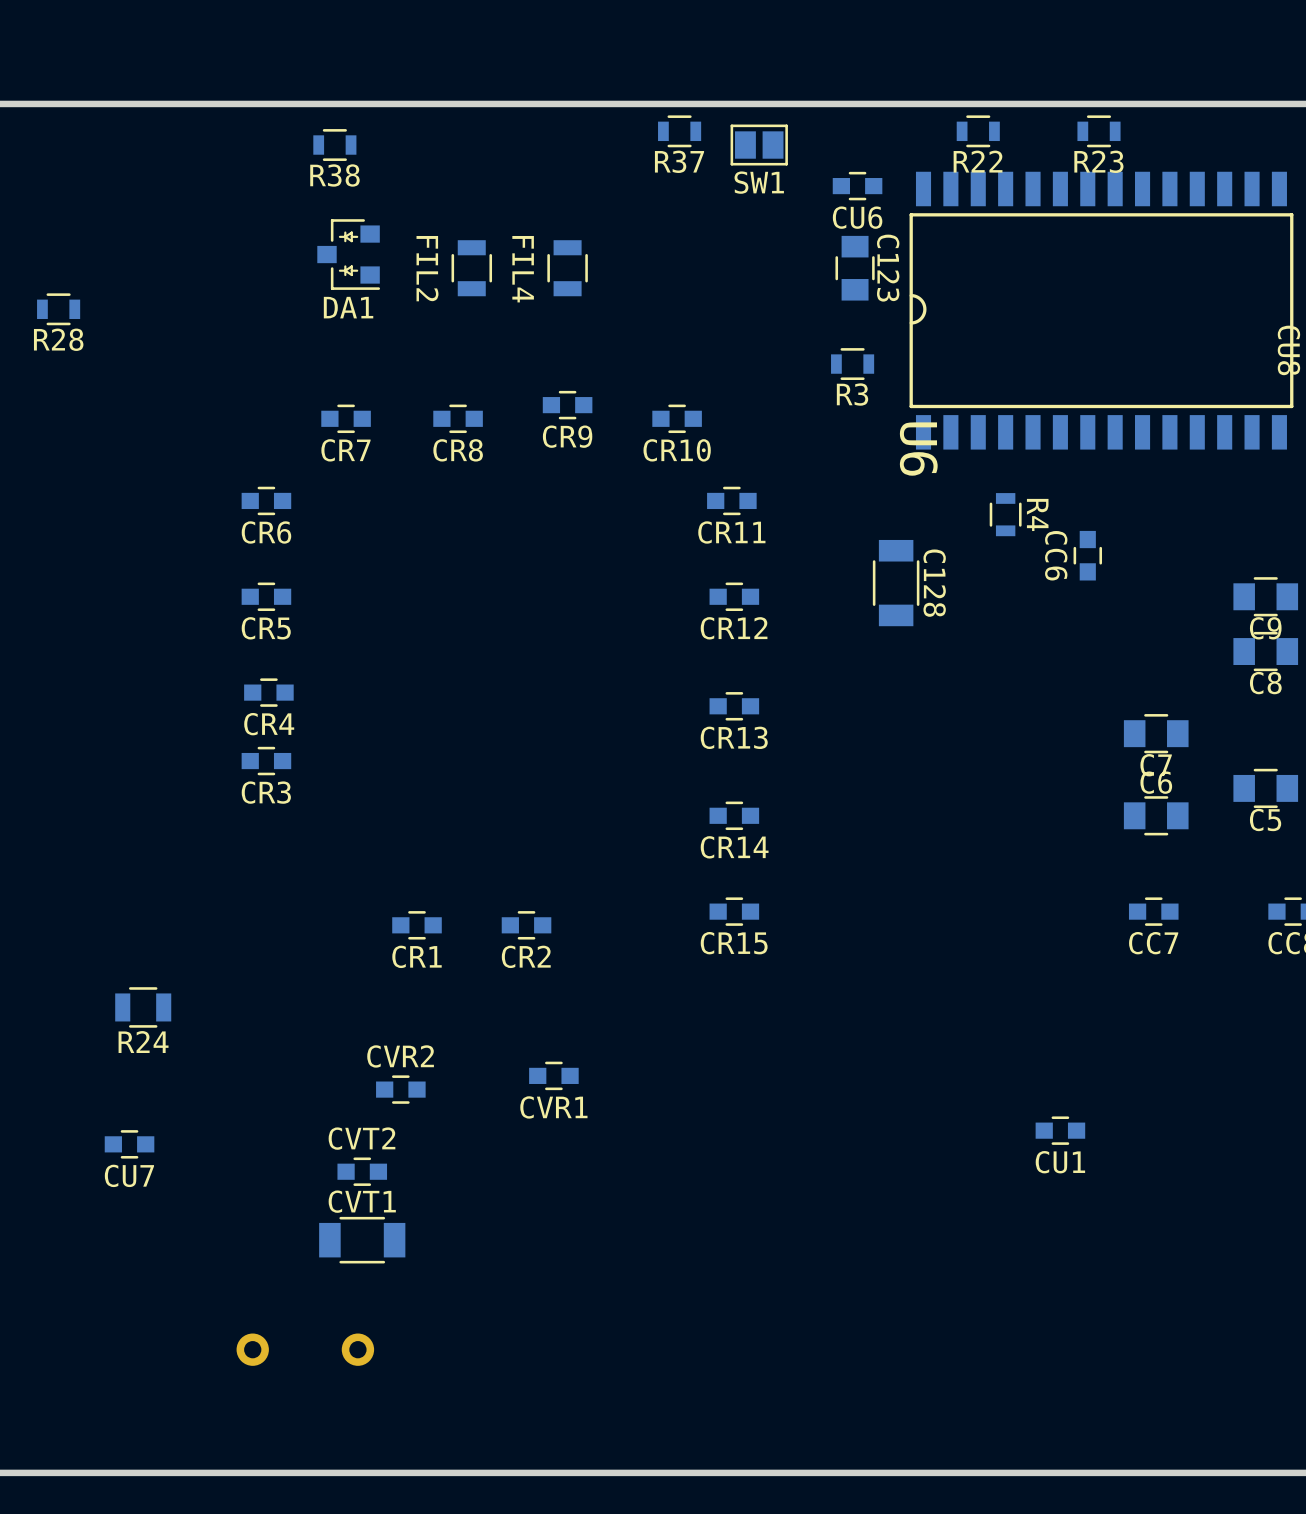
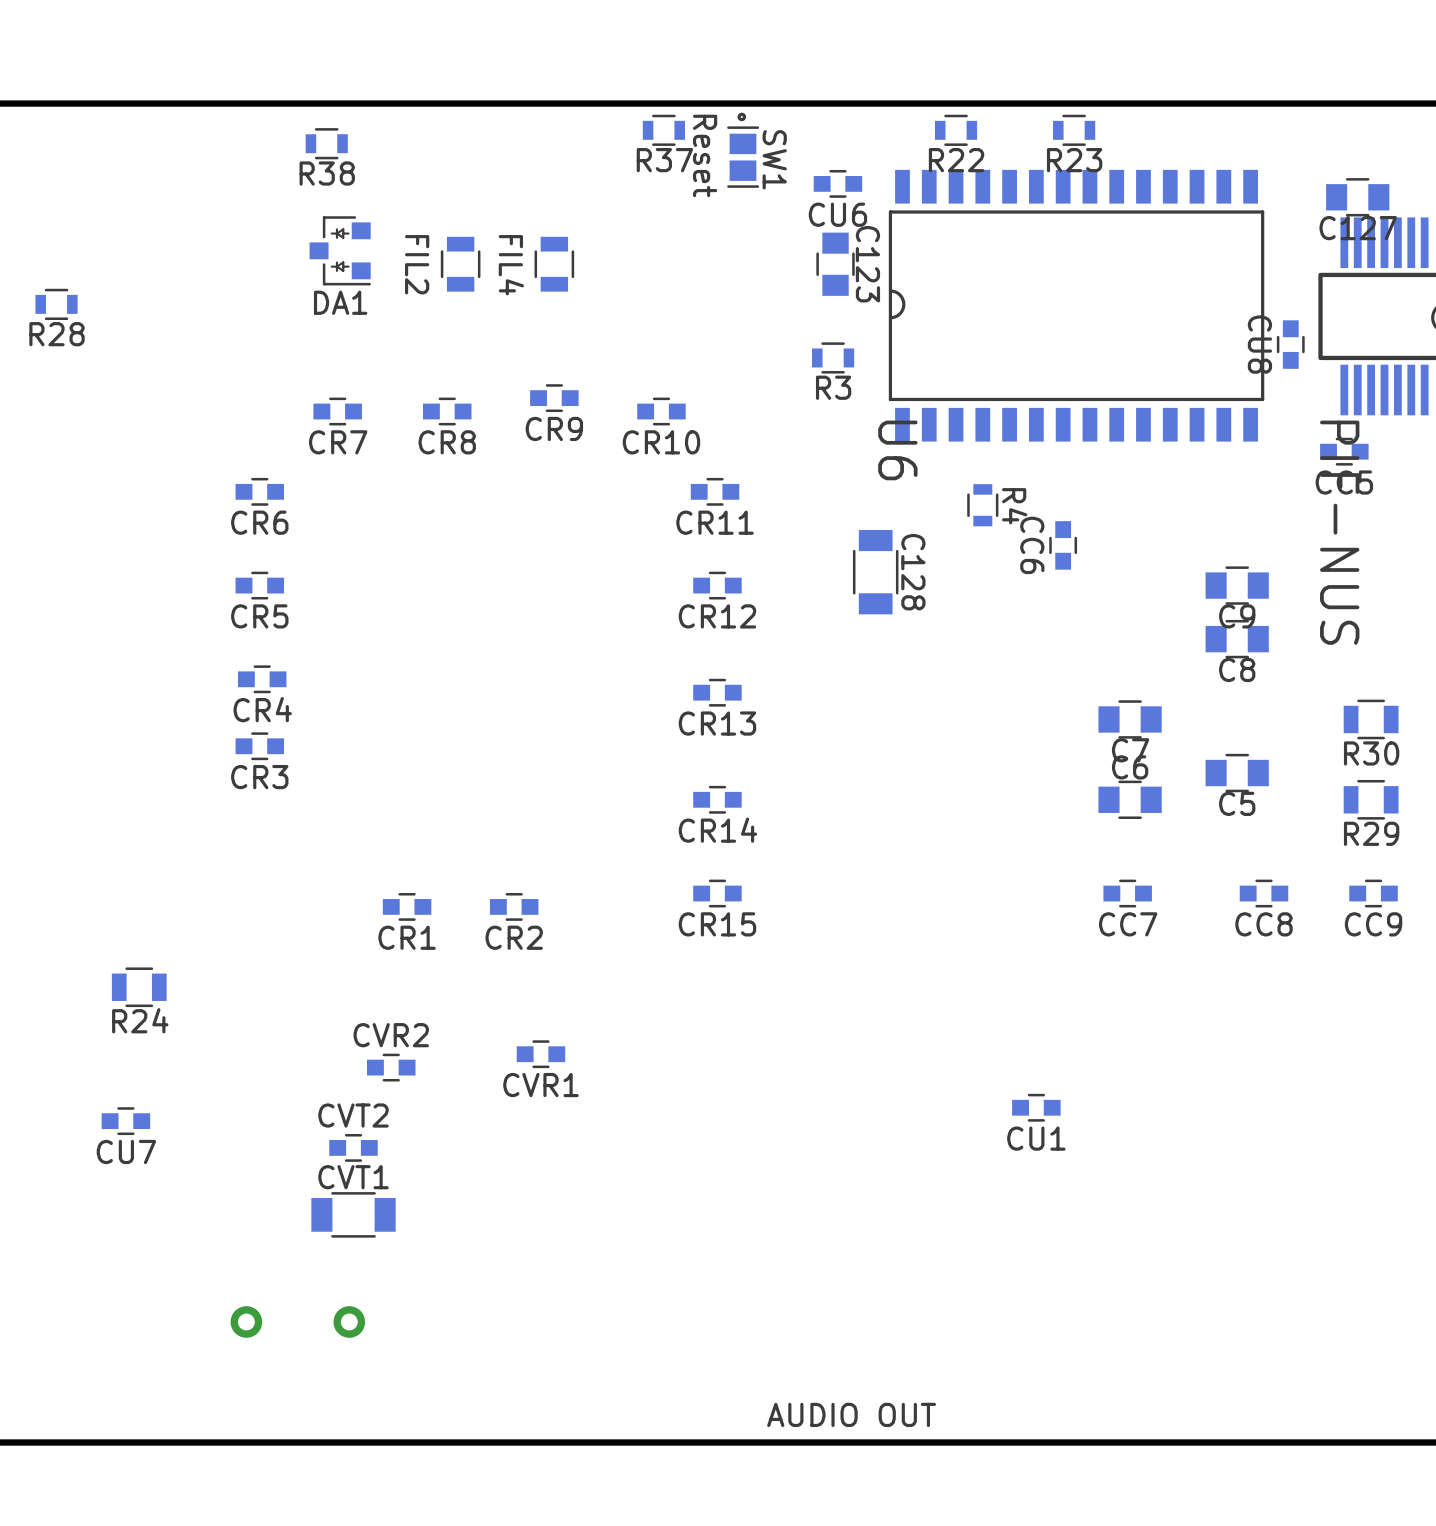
SW1 footprint: [730, 124, 788, 166] -> [727, 112, 760, 188]
SW1 value: none -> Reset (705, 155)
part: none -> AUDIO OUT (851, 1414)

